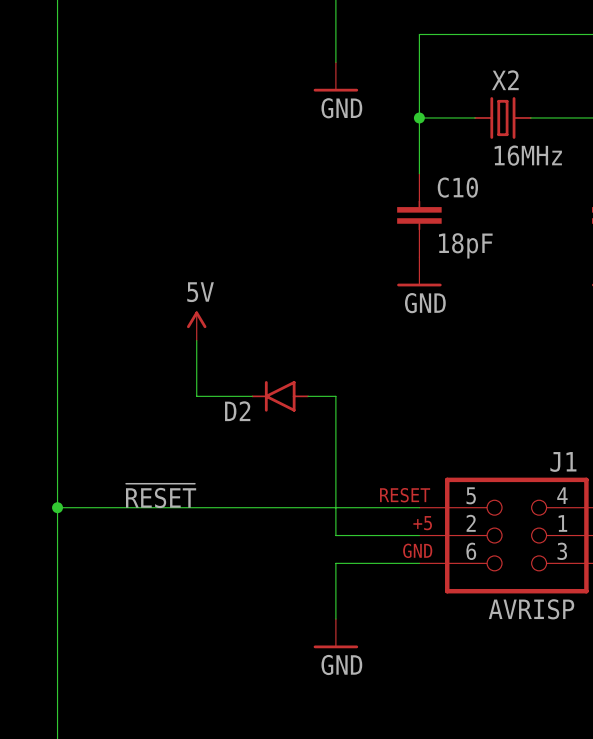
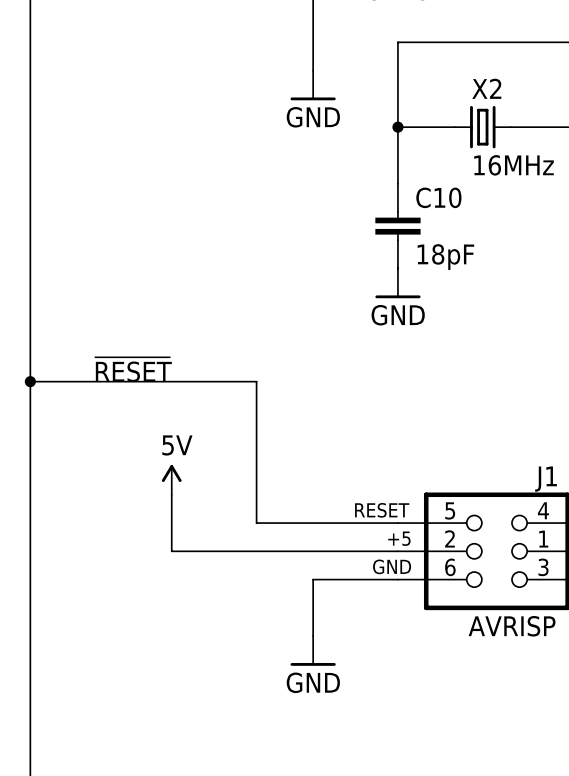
power symbol position: 5V (196, 326) -> 5V (171, 479)
wire: (196, 340) (196, 396) (252, 396) -> none
junction: none -> (30, 381)
D2: (280, 396) -> none
wire: (308, 396) (335, 396) (335, 535) -> (171, 494) (171, 551) (313, 551)
label position: ~{RESET} (161, 495) -> ~{RESET} (133, 369)
wire: (57, 507) (280, 507) -> (30, 381) (256, 381) (256, 523)
junction: (57, 507) -> none

